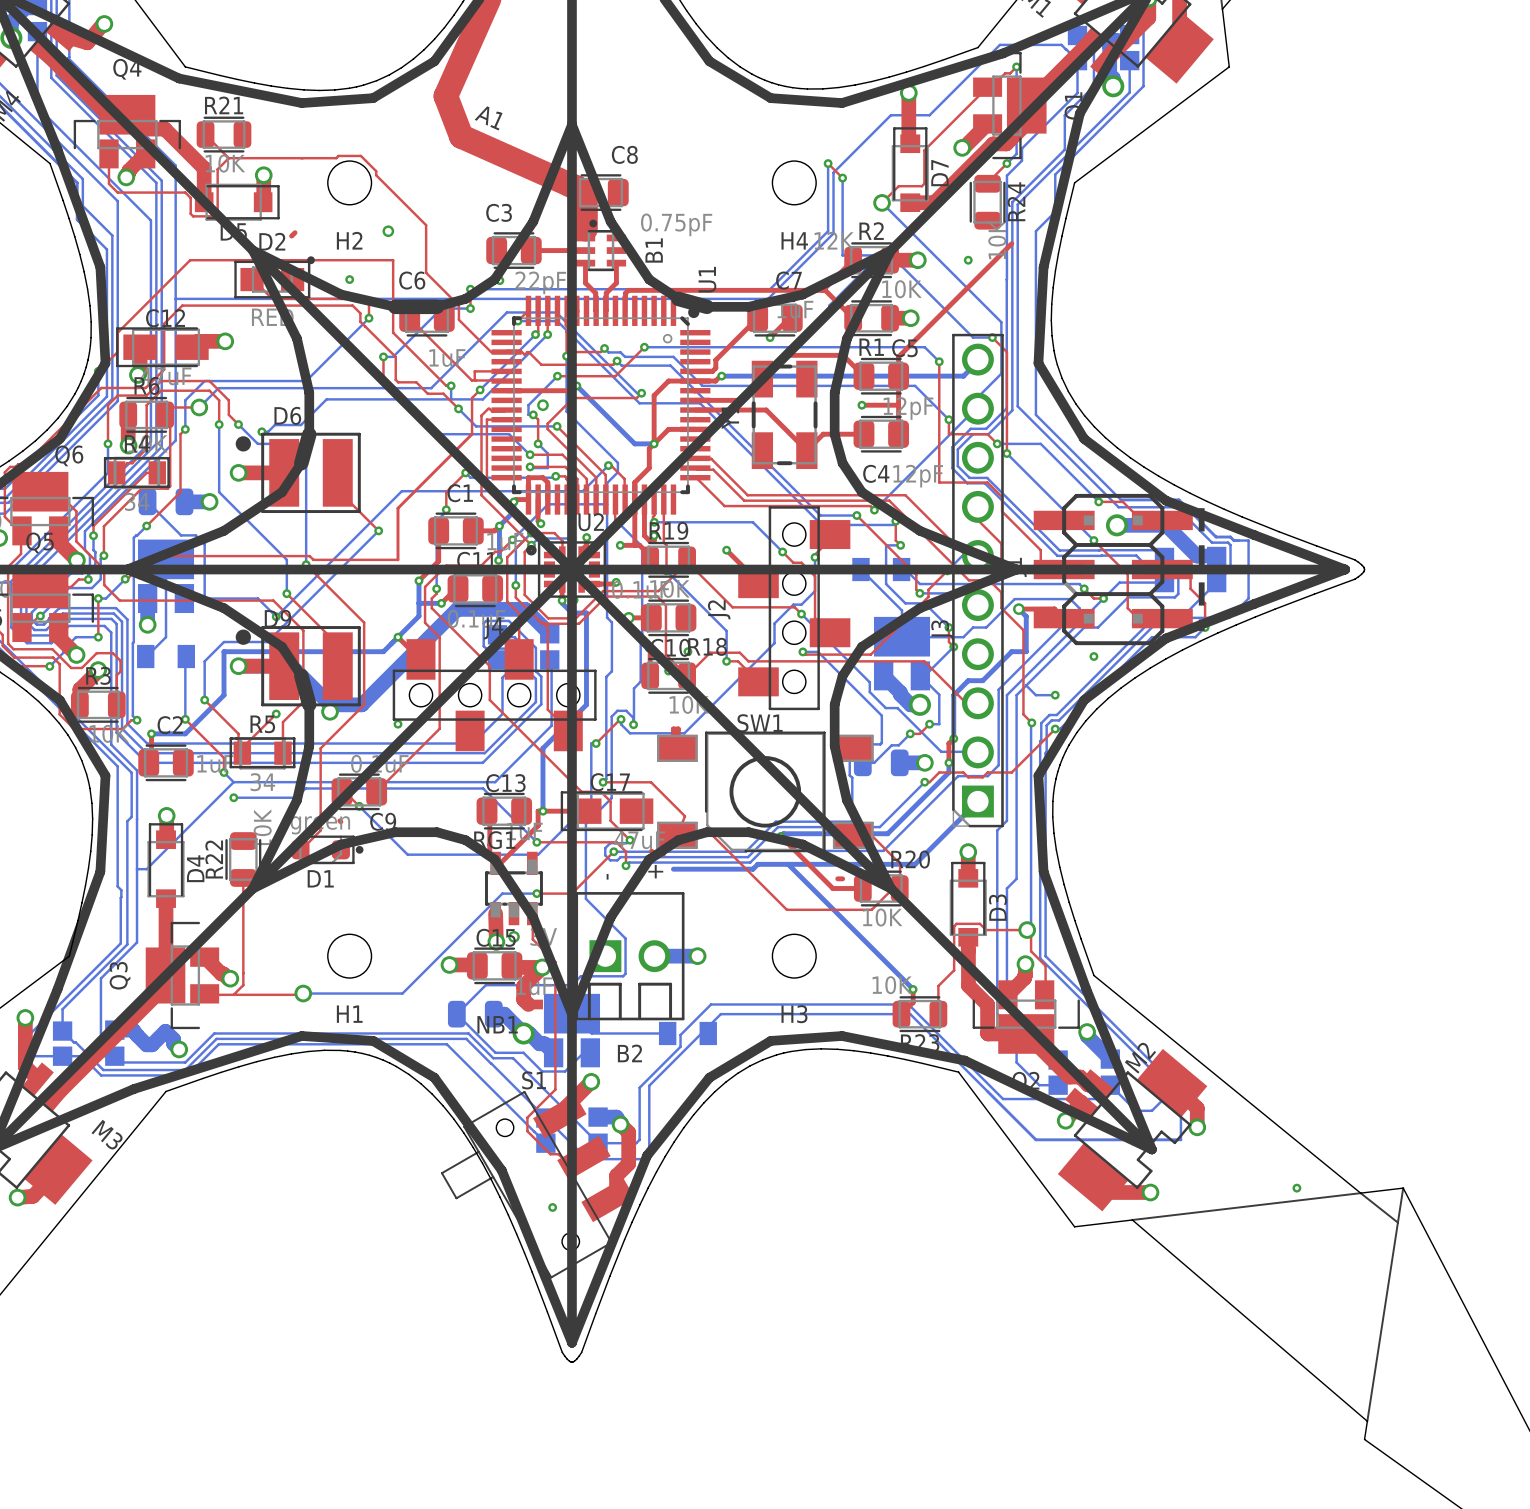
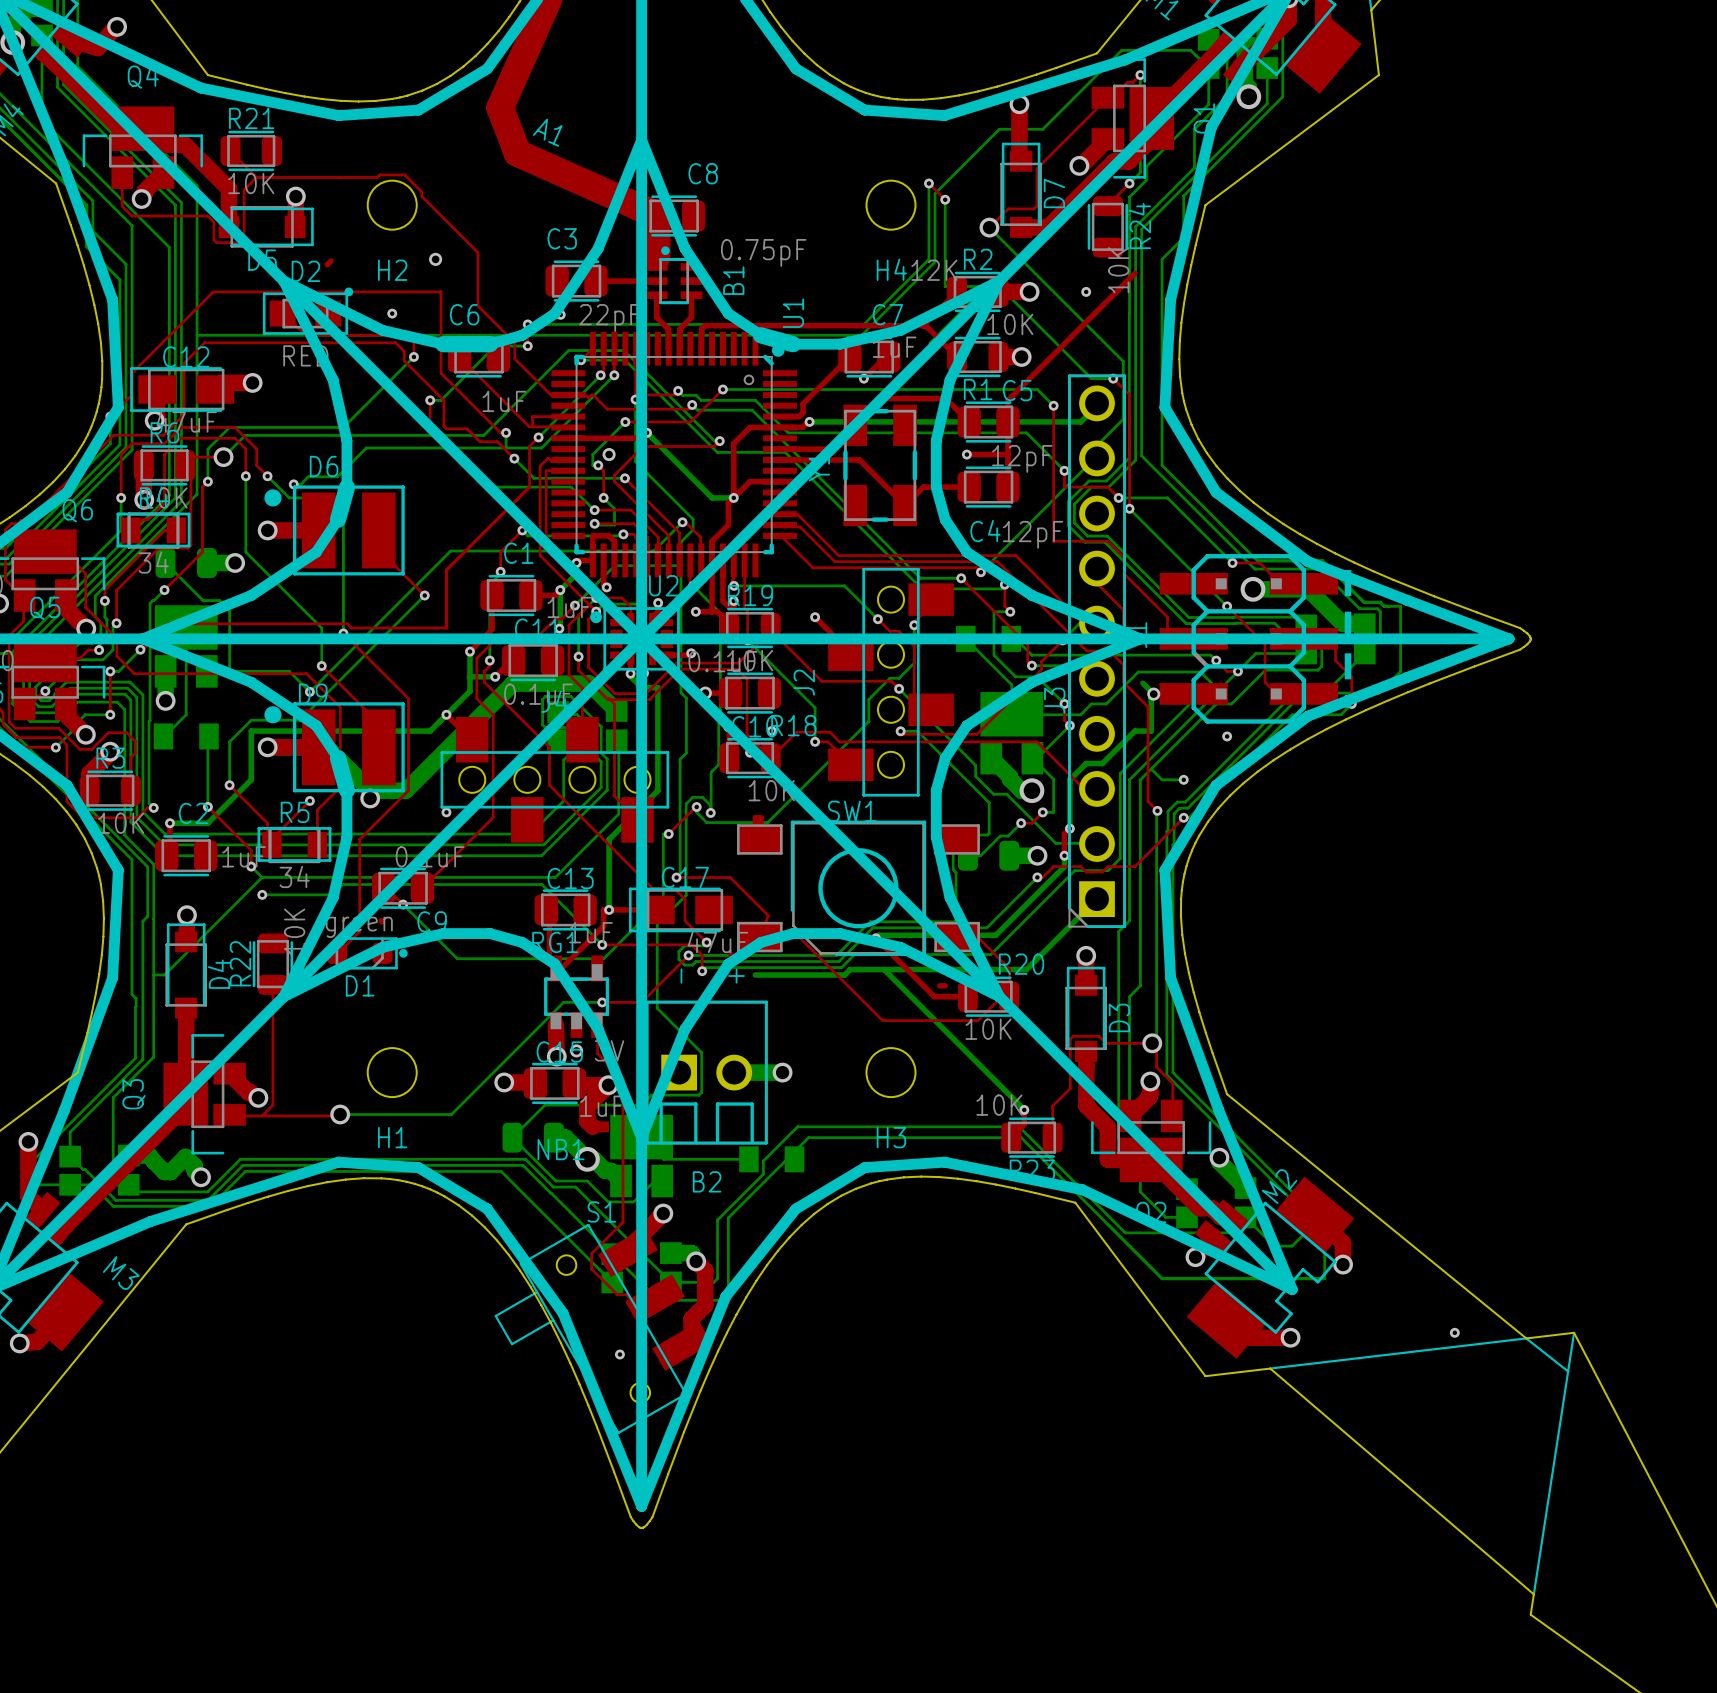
top track: (1018, 609) (1054, 608) (1064, 618) -> none
via position: (1018, 609) -> (1153, 694)

